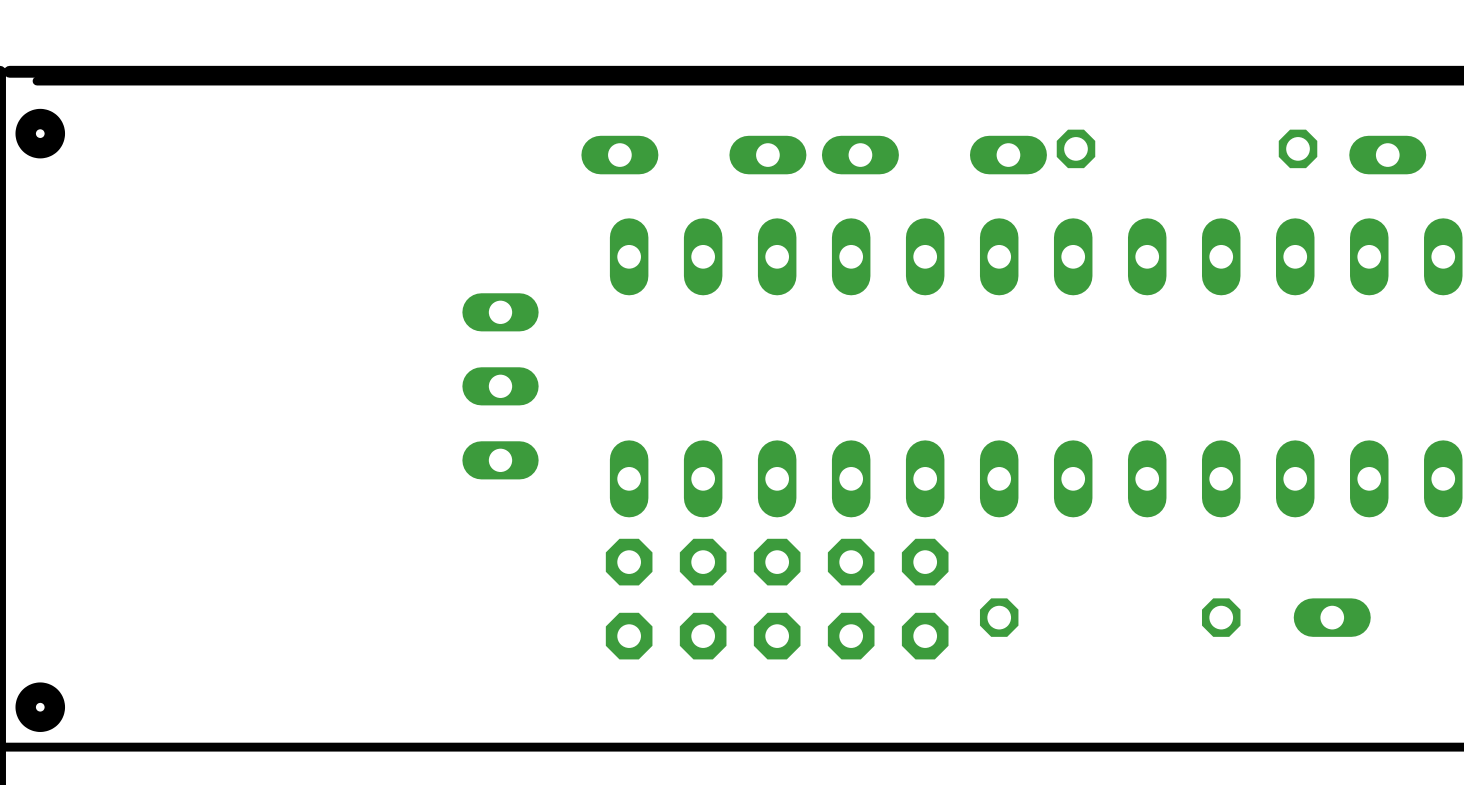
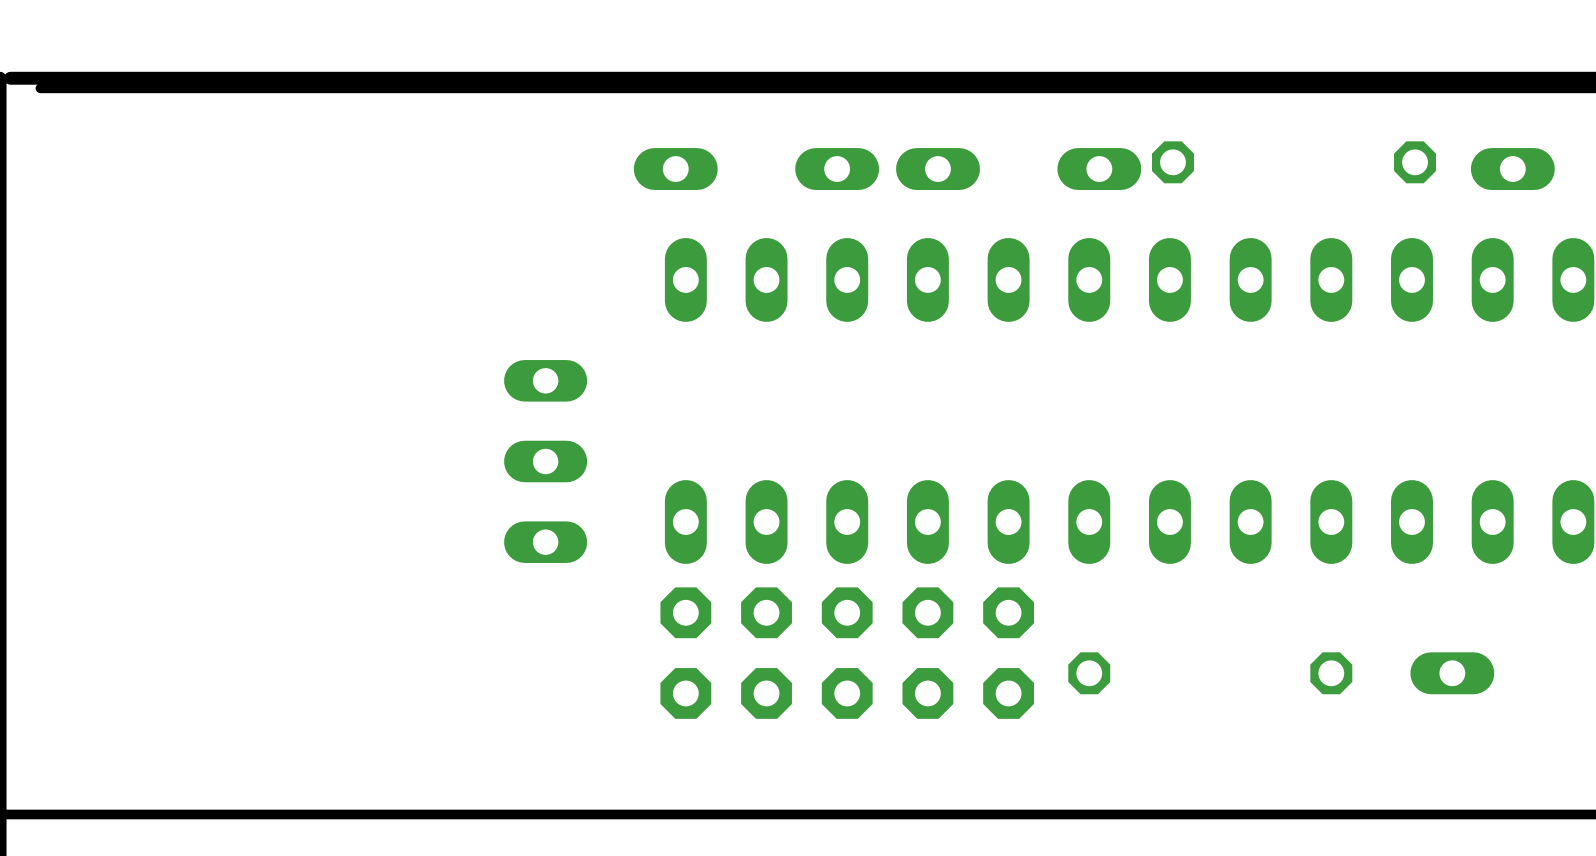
round board edge: [15, 108, 66, 159] -> none
part position: (500, 386) -> (545, 461)
round board edge: [15, 682, 66, 732] -> none

